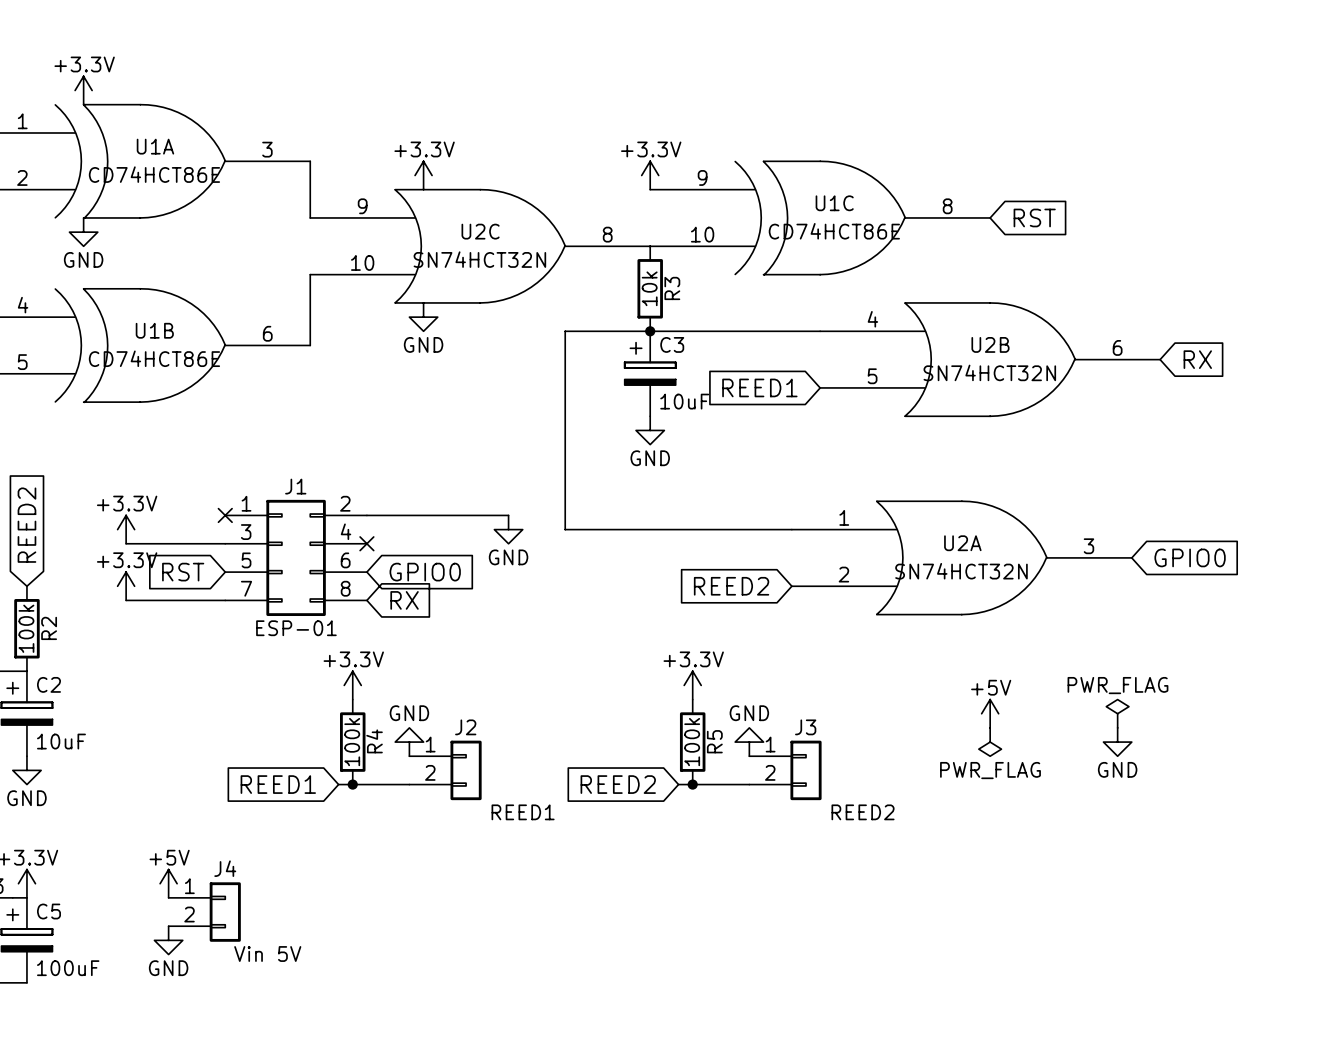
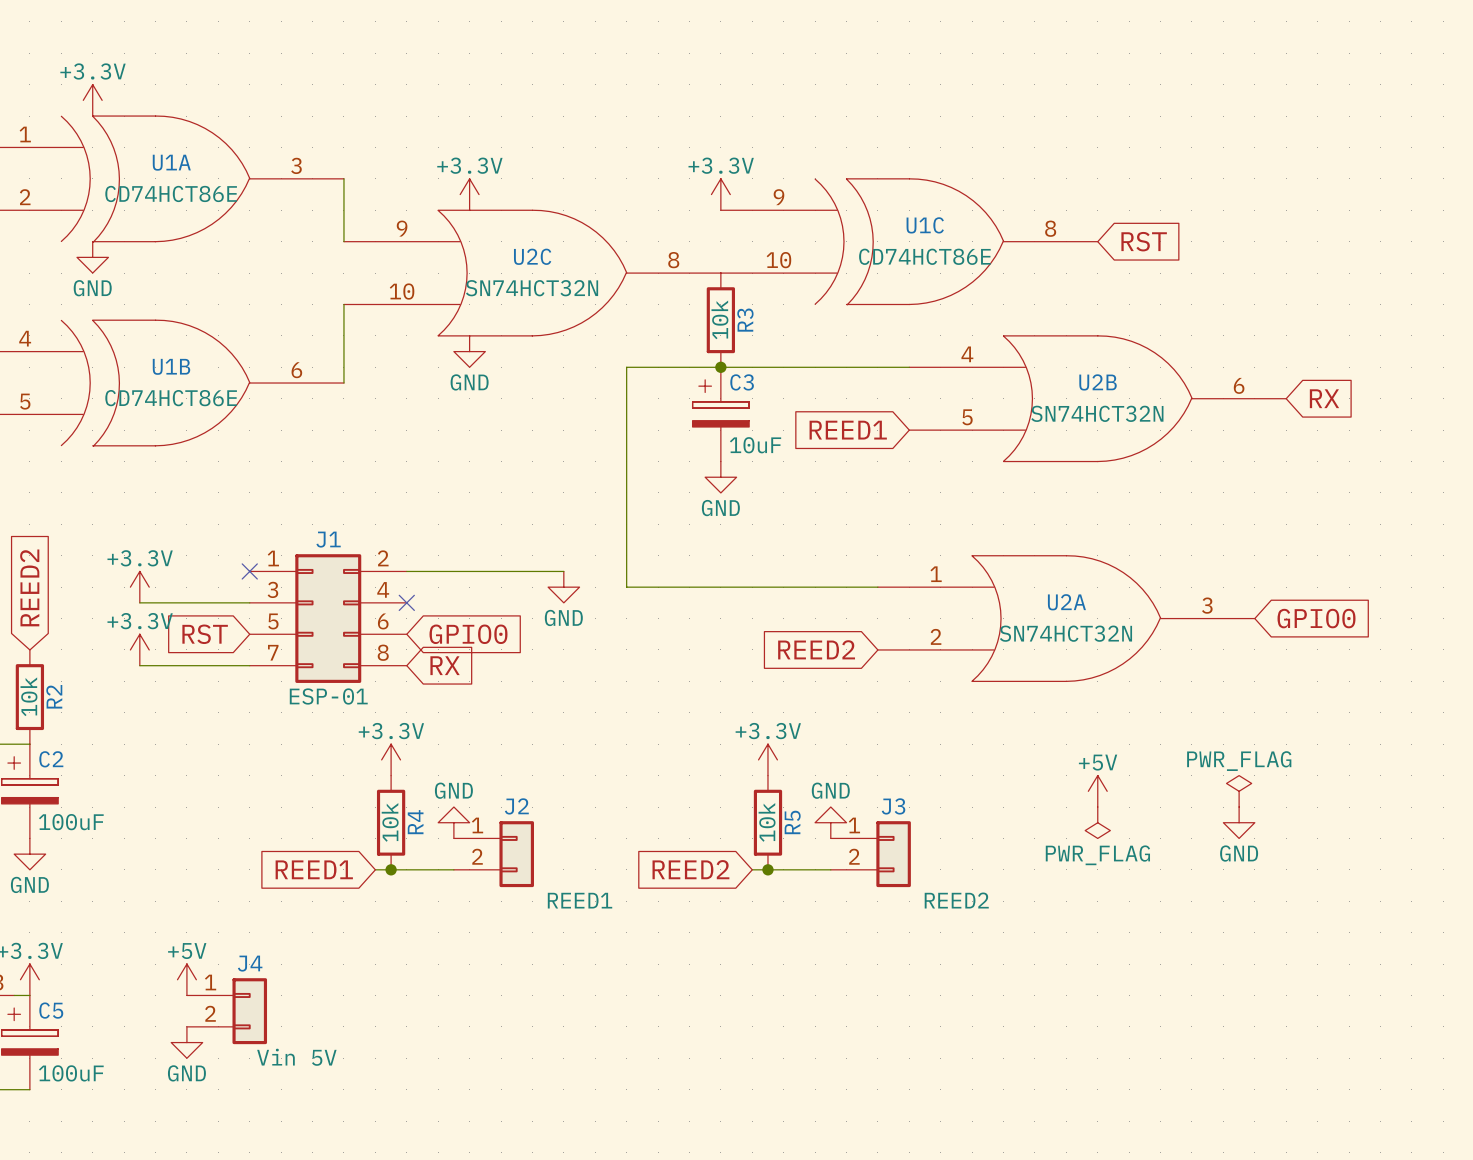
R2 value: 100k (26, 628) -> 10k (28, 696)
C2 value: 10uF (61, 741) -> 100uF (71, 822)
R4 value: 100k (352, 742) -> 10k (390, 822)
R5 value: 100k (692, 742) -> 10k (767, 822)

